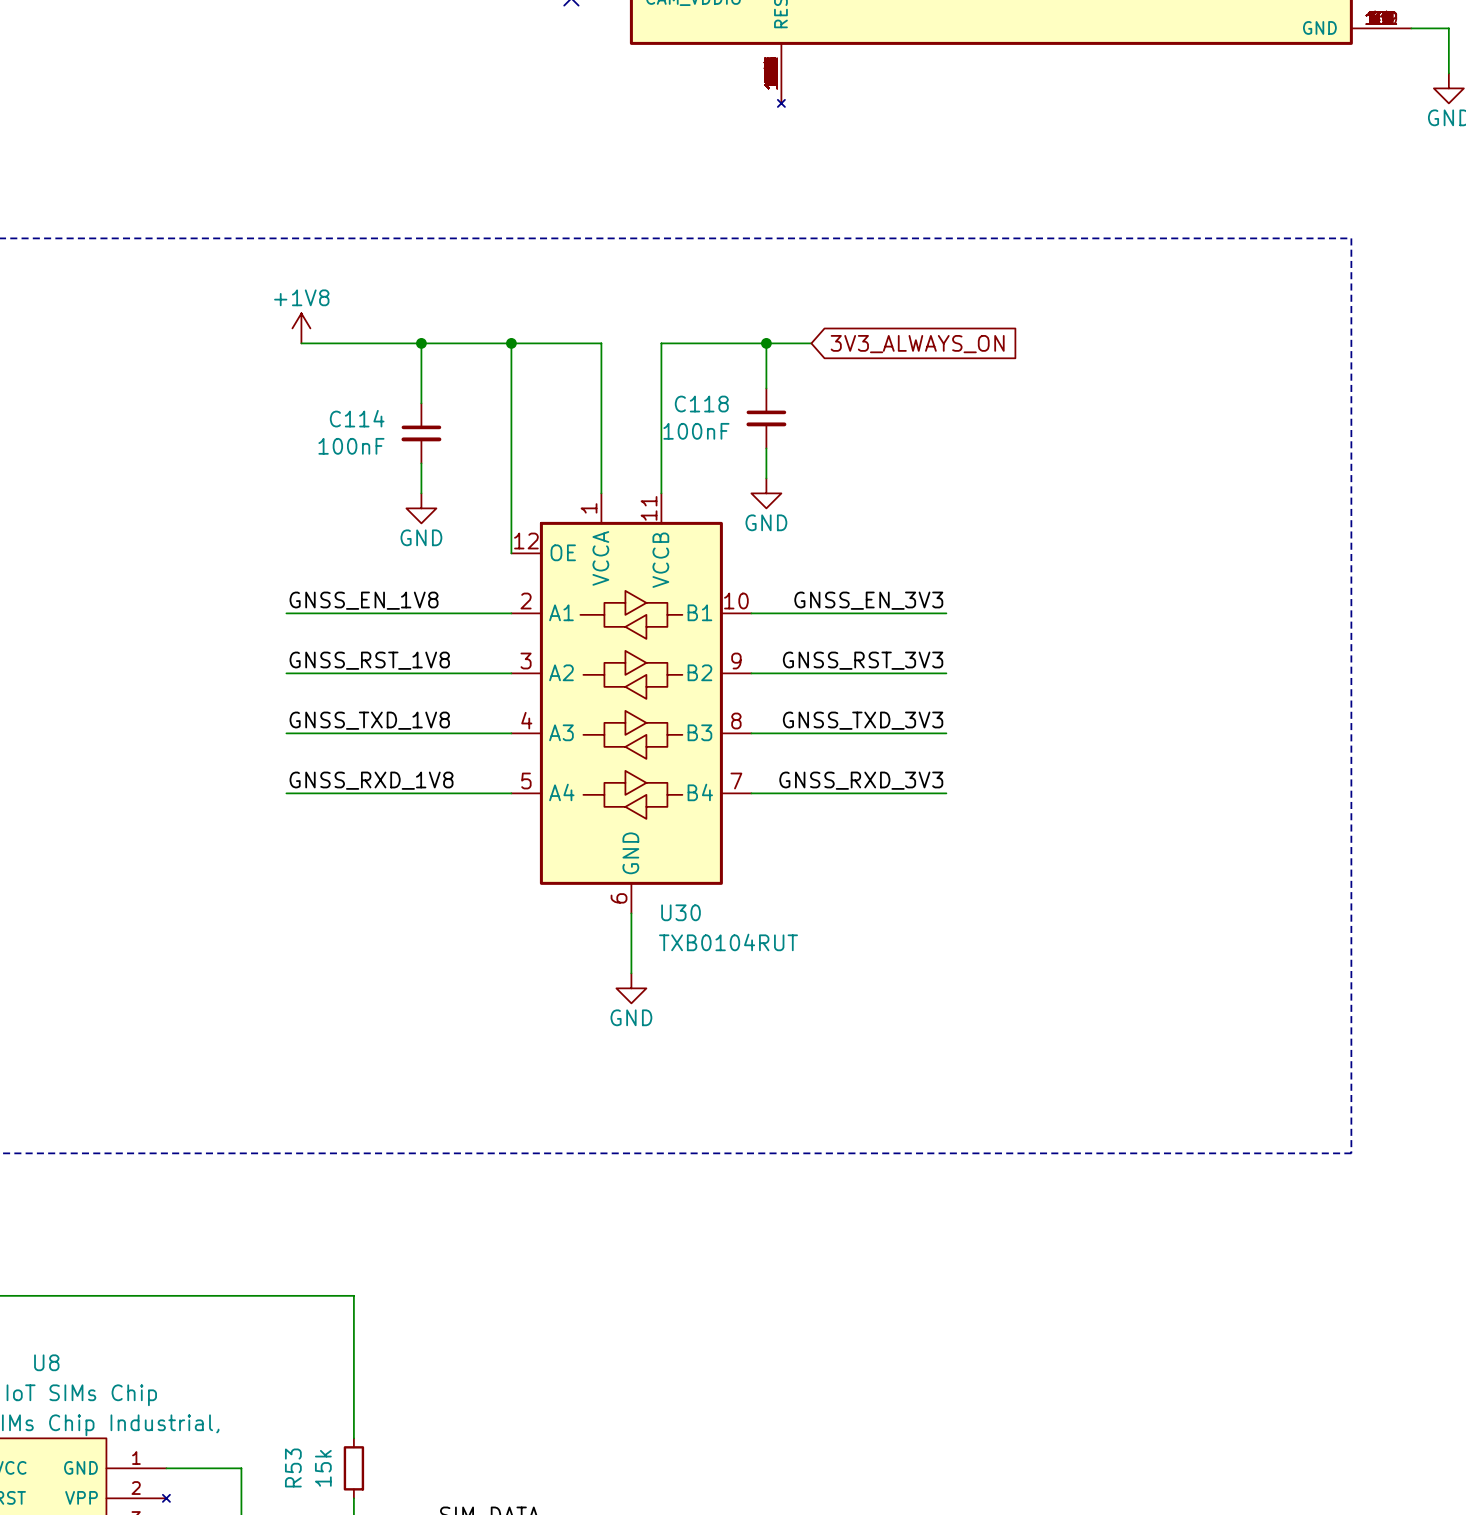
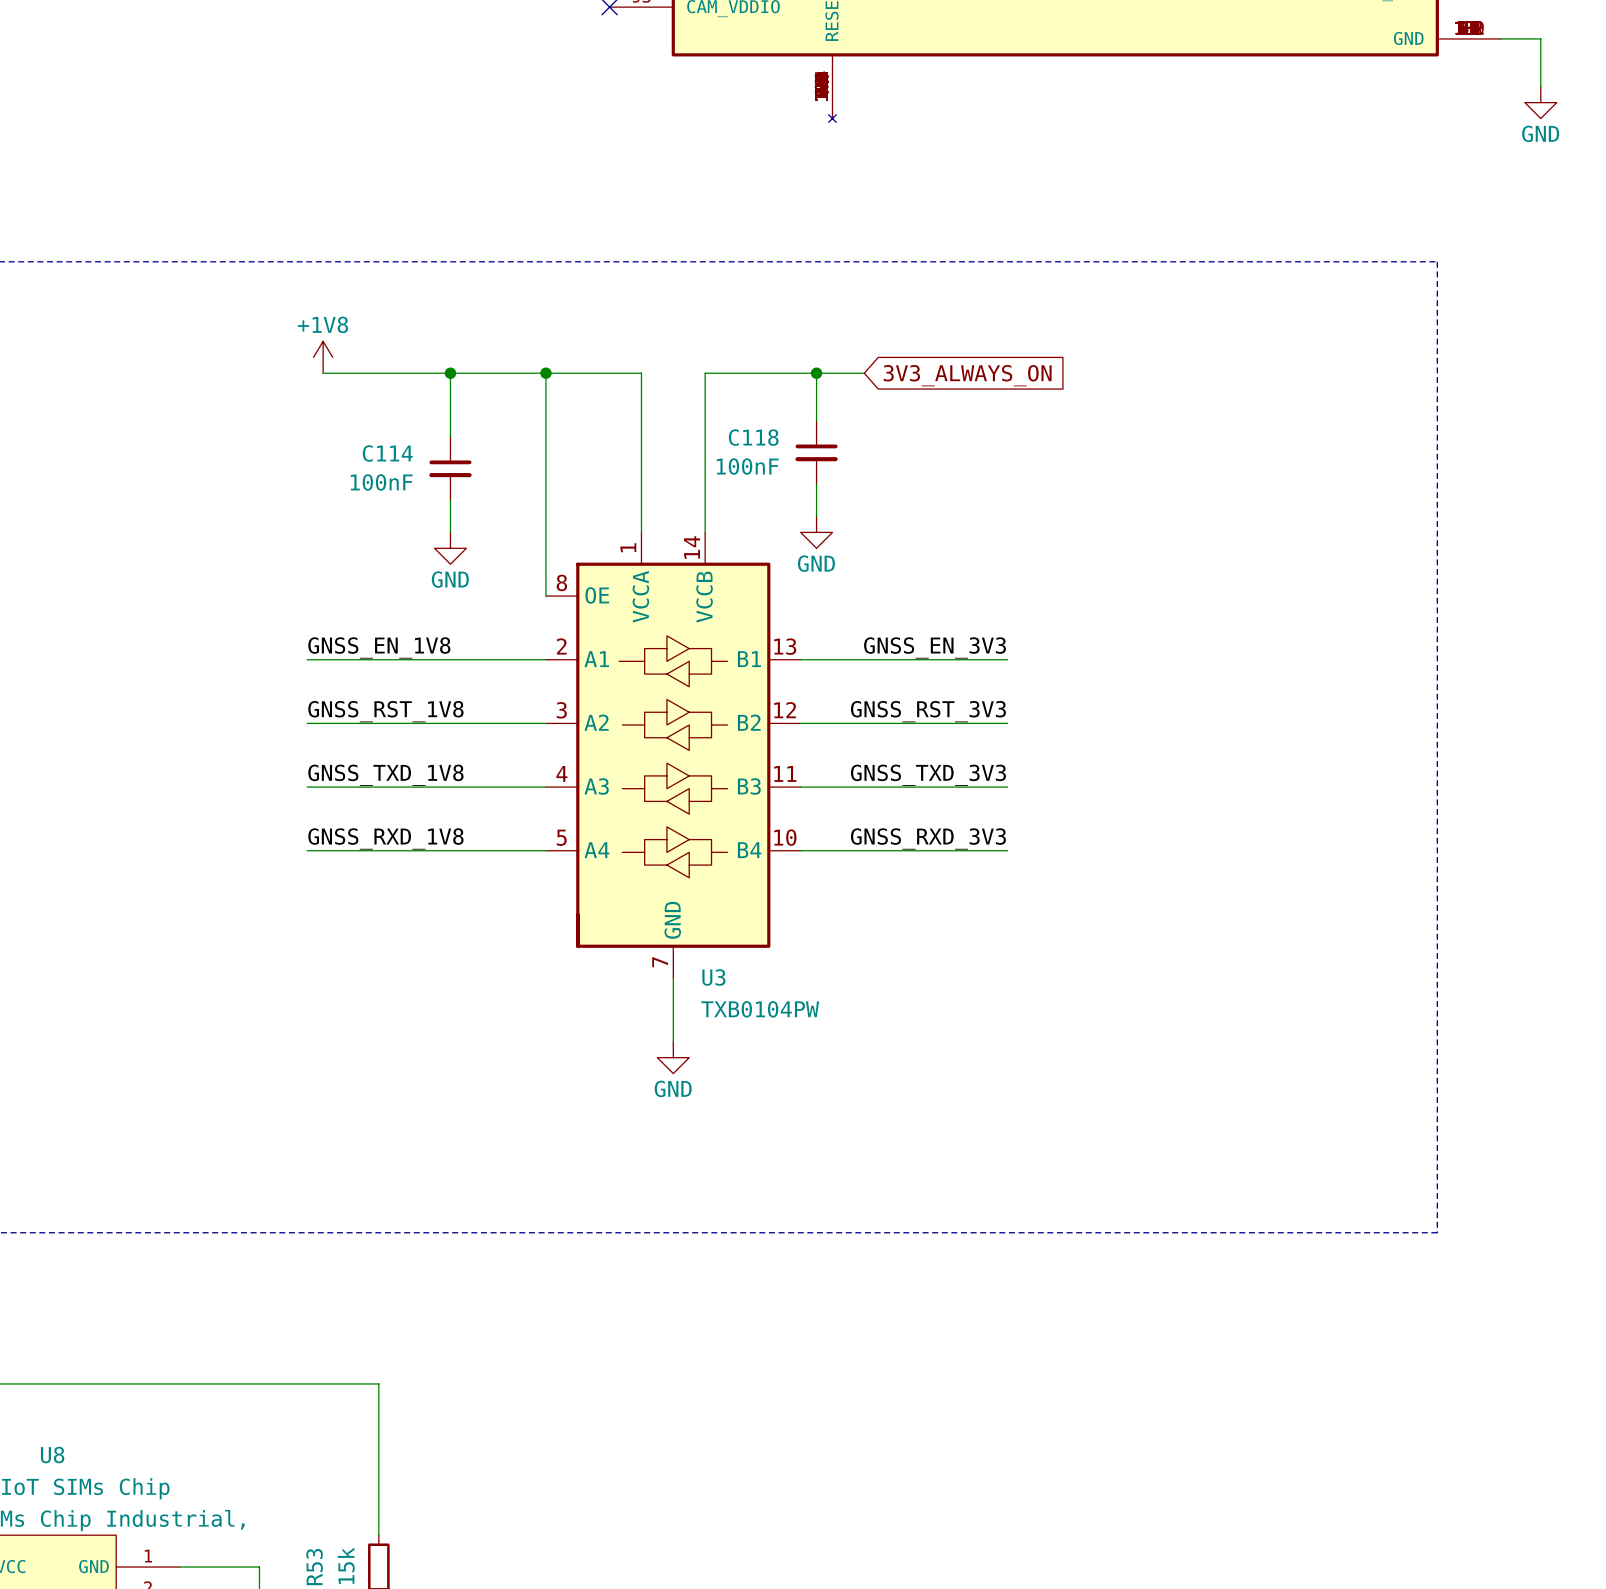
U30: TXB0104RUT (631, 703) -> none
U3: none -> TXB0104PW (673, 755)

